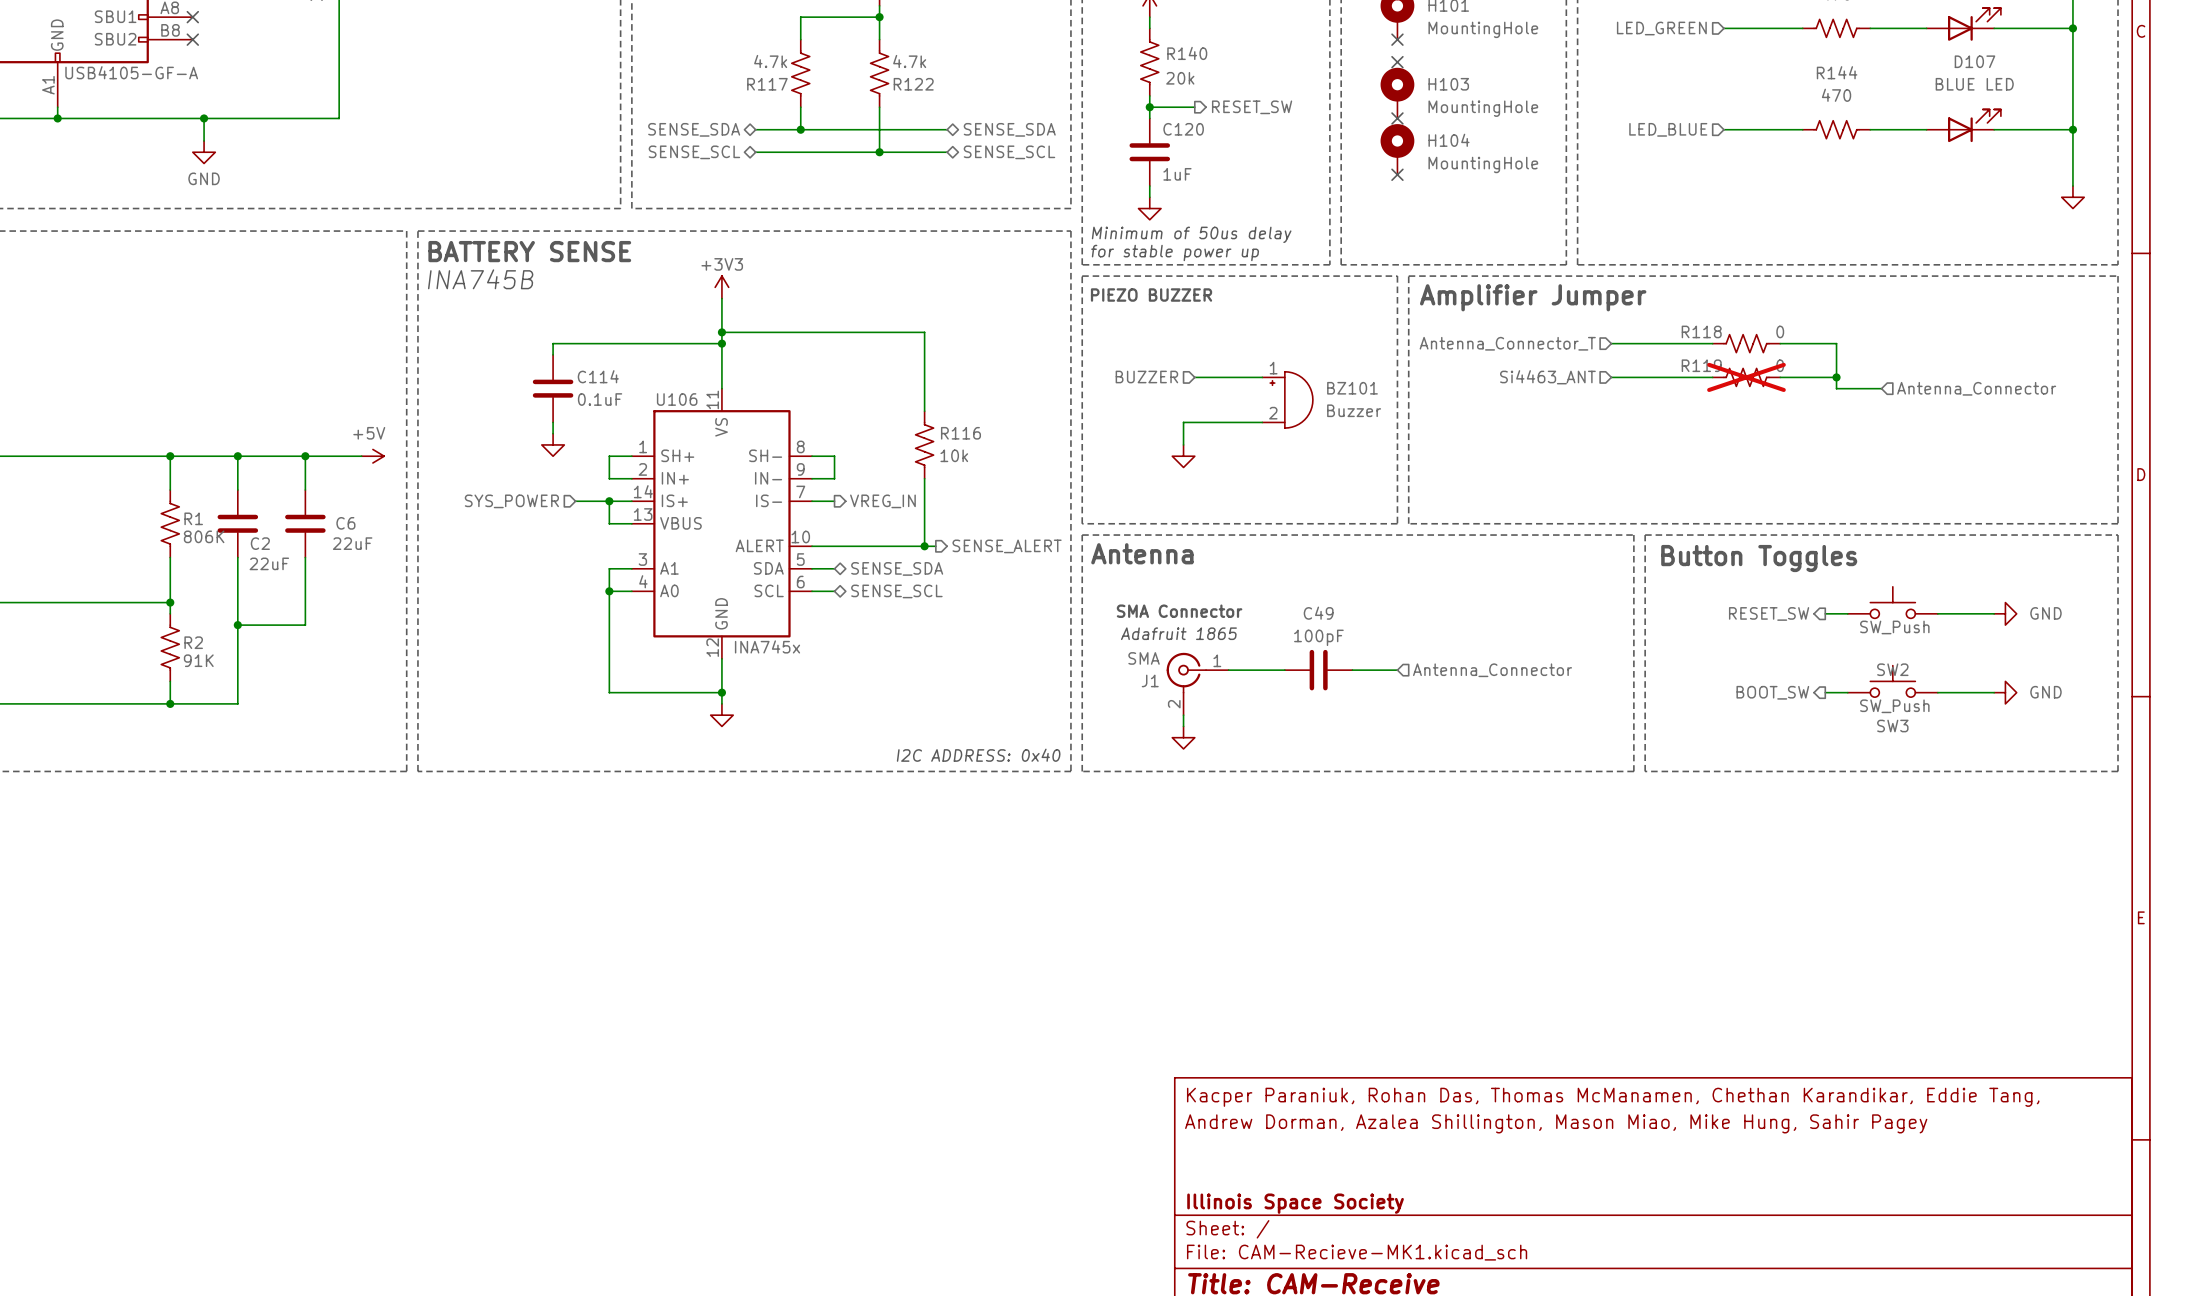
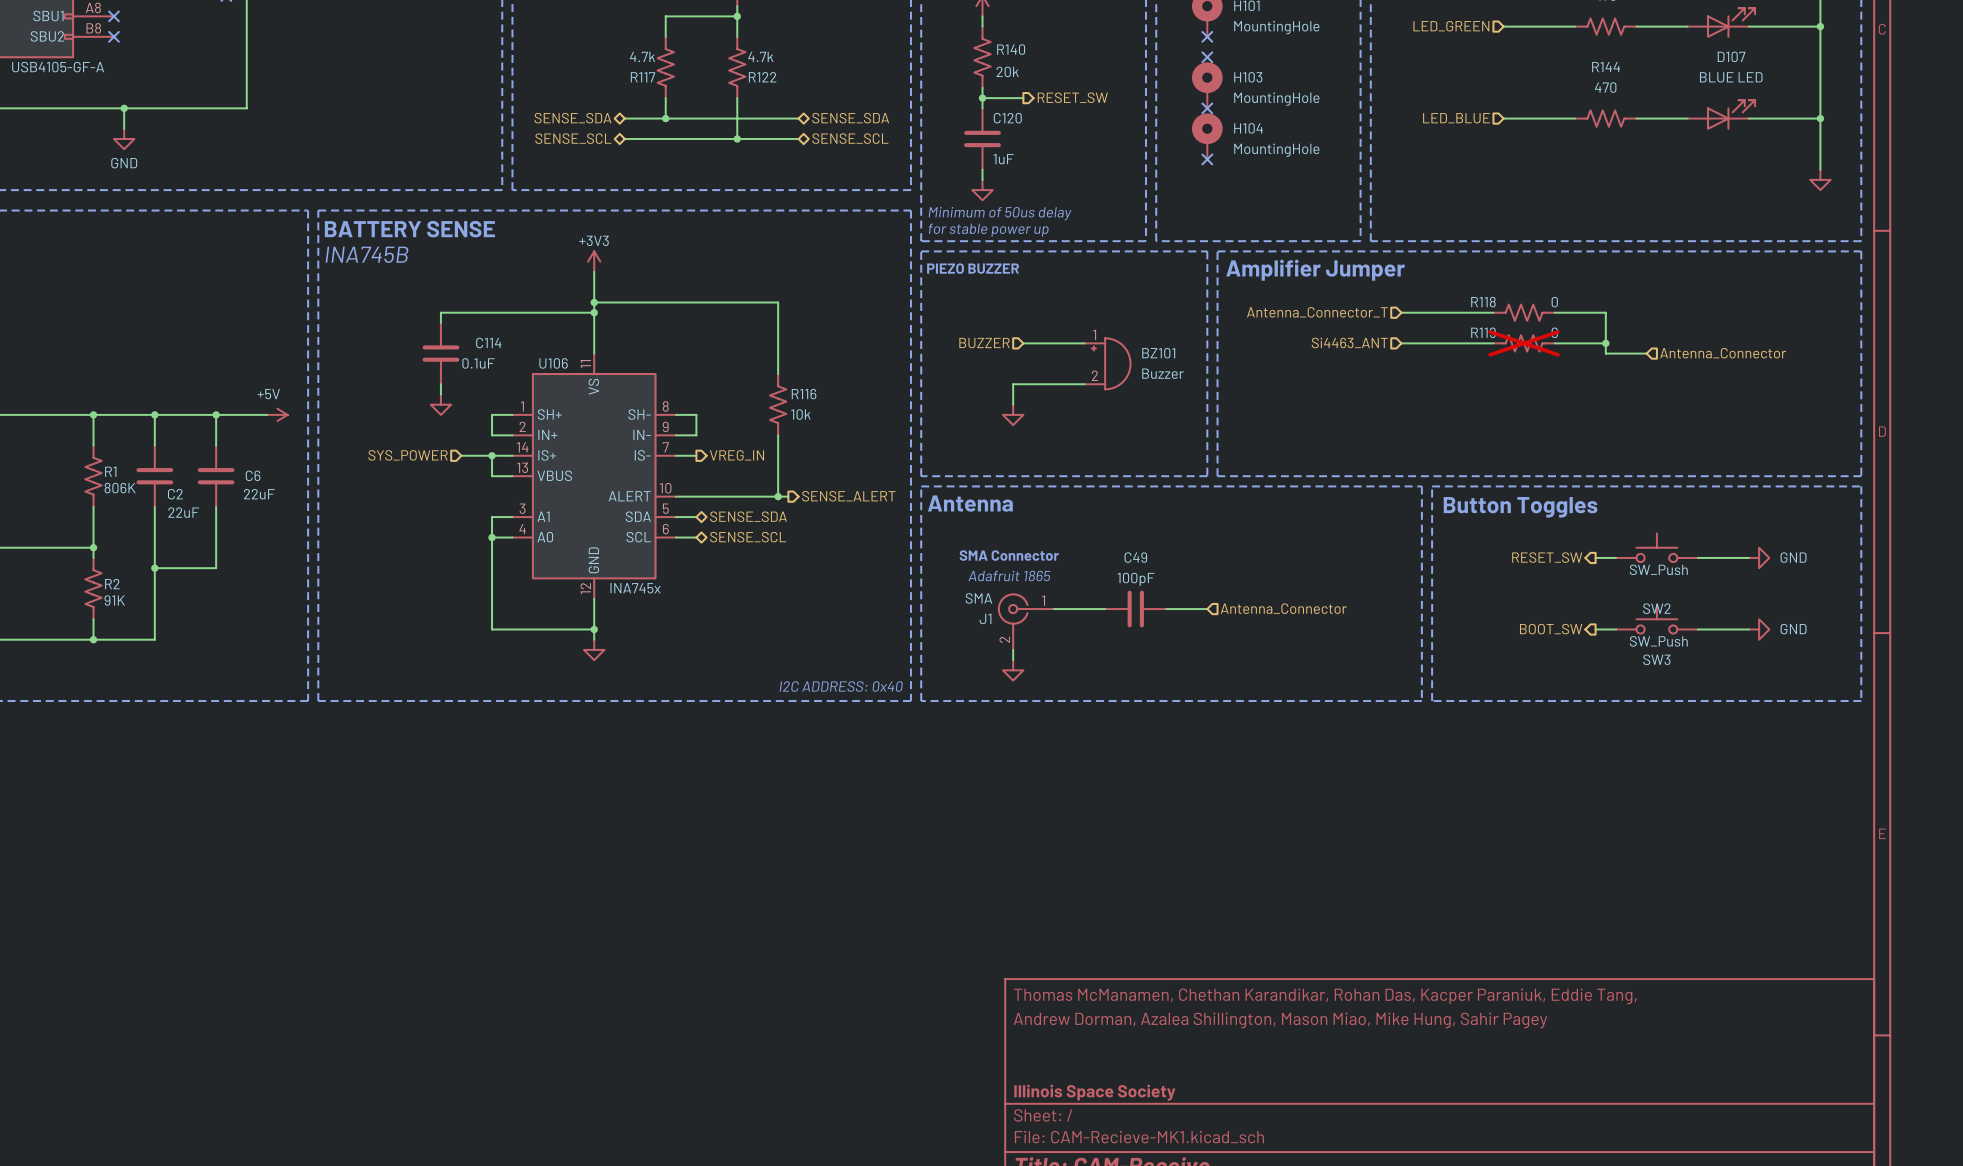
title block: Kacper Paraniuk, Rohan Das, Thomas McManamen, Chethan Karandikar, Eddie Tang, (1613, 1097) -> Thomas McManamen, Chethan Karandikar, Rohan Das, Kacper Paraniuk, Eddie Tang, (1325, 996)

